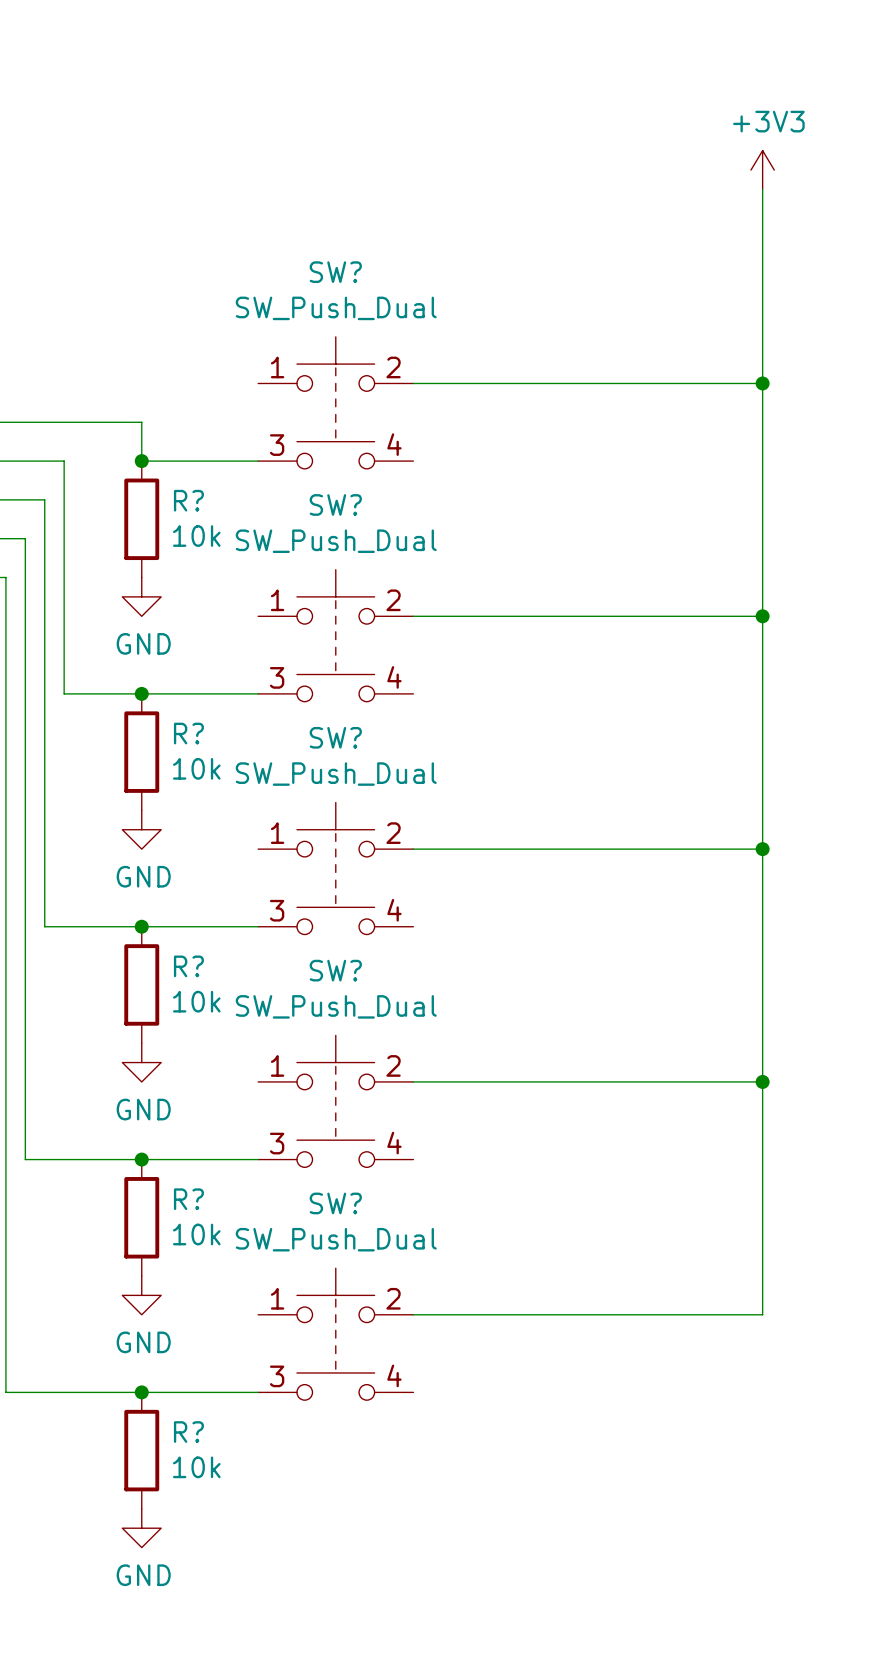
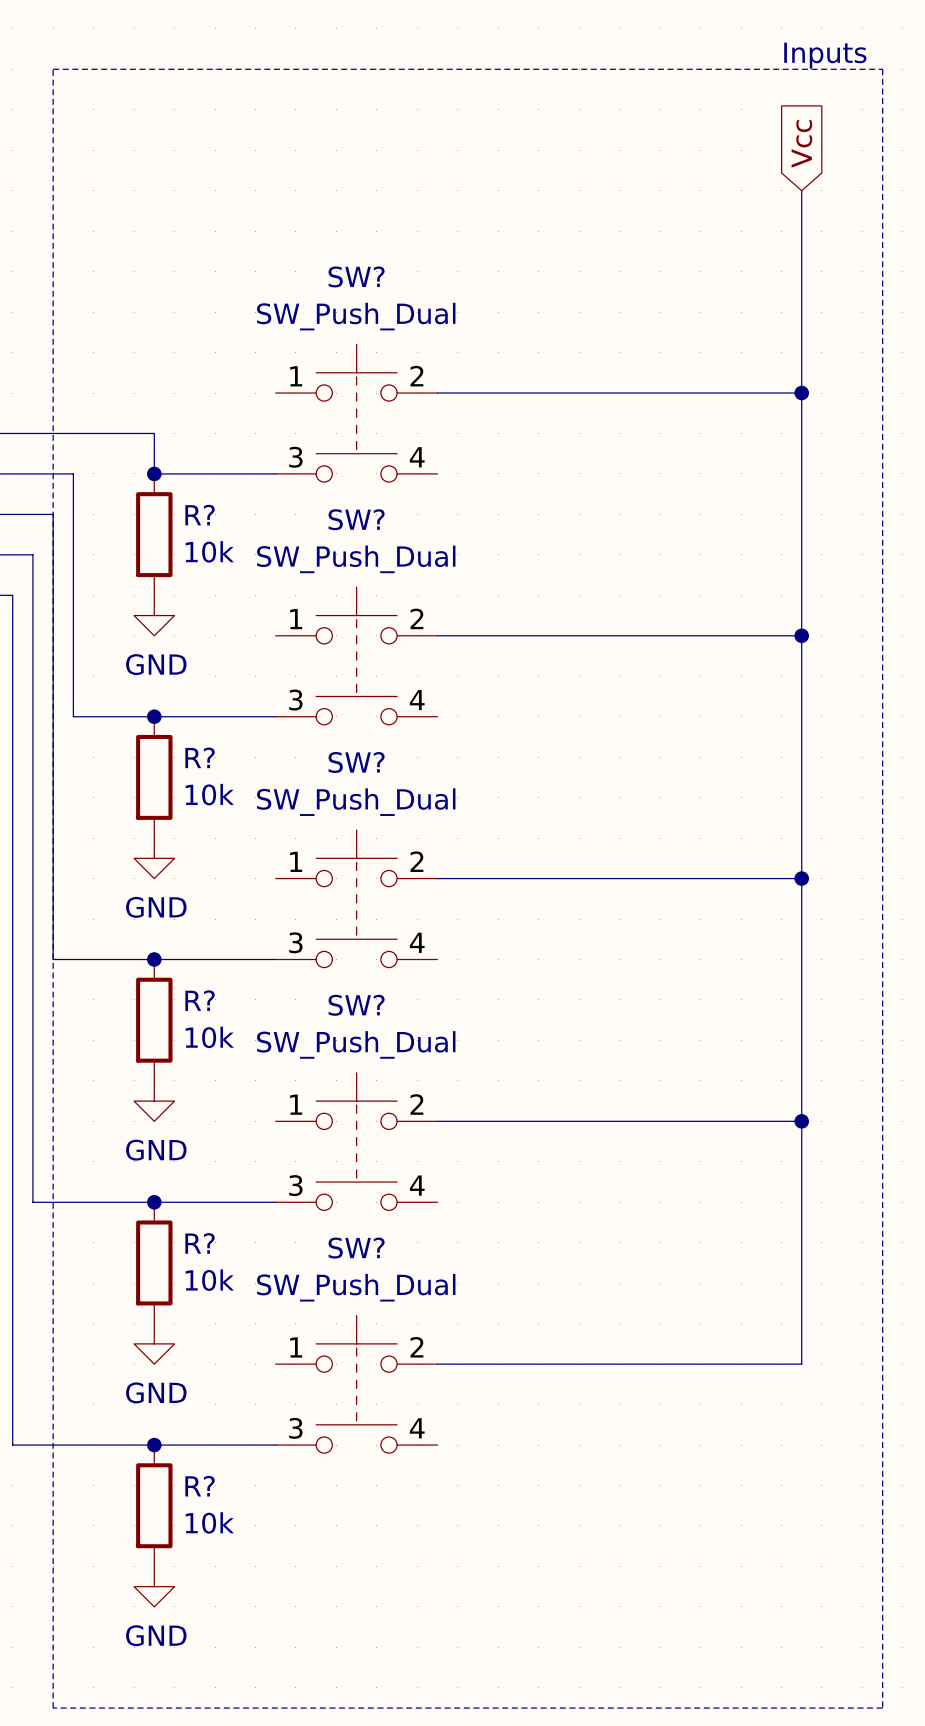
text: none -> Inputs (825, 55)
line: none -> (53, 69) (53, 1708) (882, 1708) (882, 69) (53, 69)
global label: none -> Vcc (801, 143)
power symbol: +3V3 (762, 170) -> none

